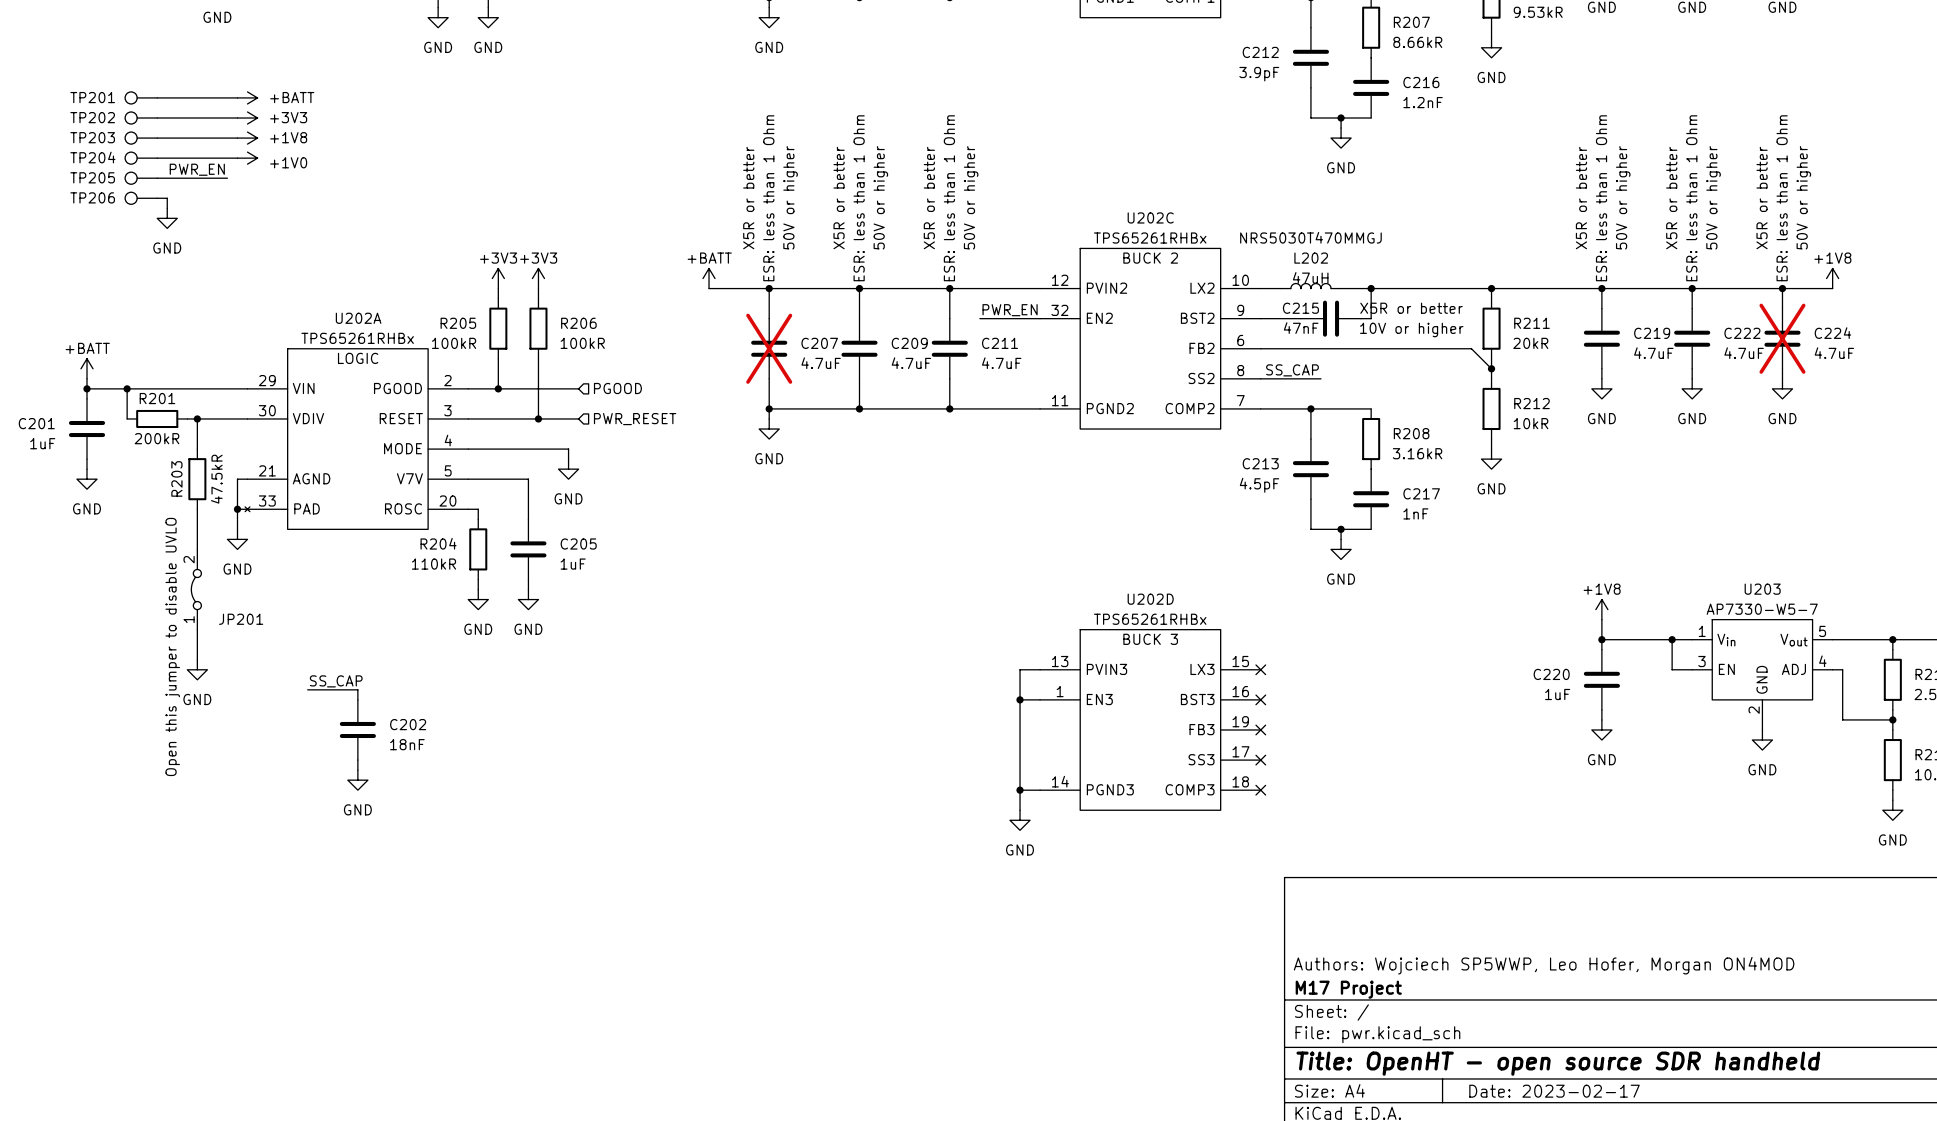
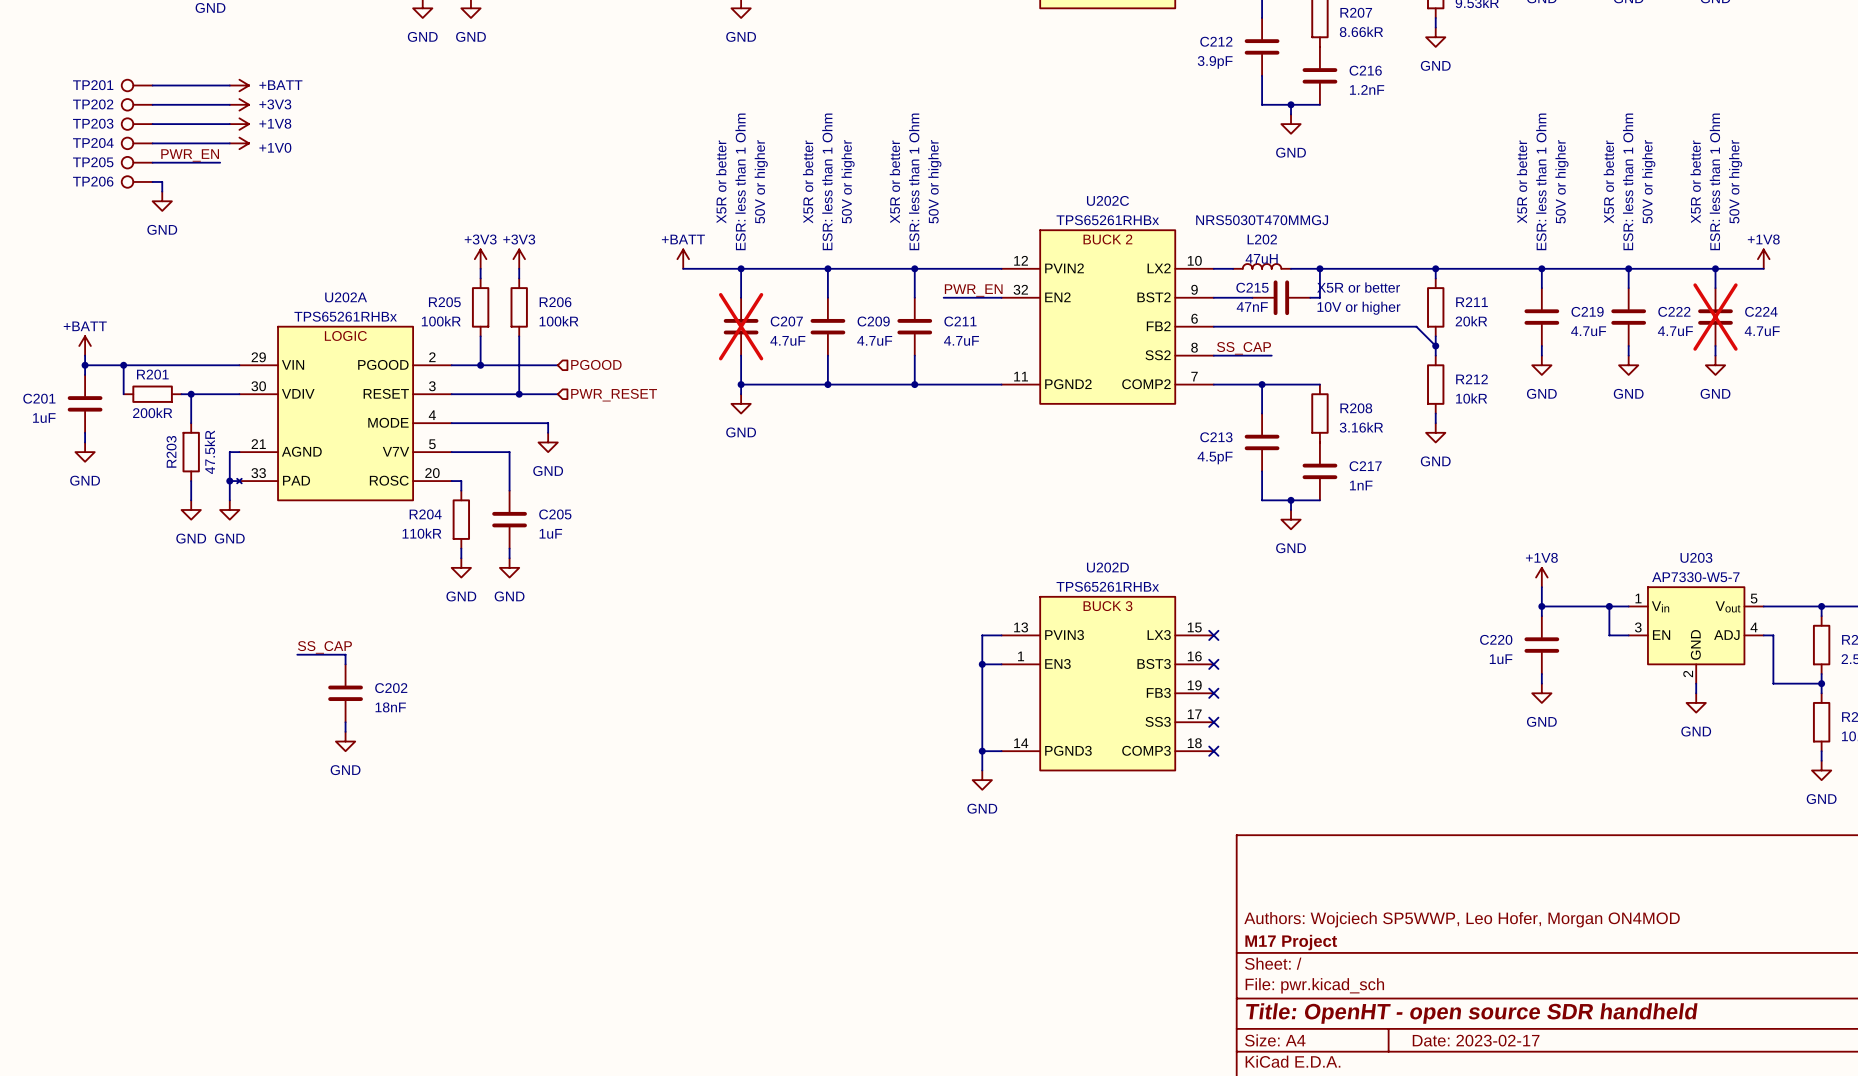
JP201: (196, 589) -> none
wire: (197, 629) (197, 659) -> none
text: Open this jumper to disable UVLO (172, 646) -> none
power symbol position: GND (197, 669) -> GND (191, 509)

